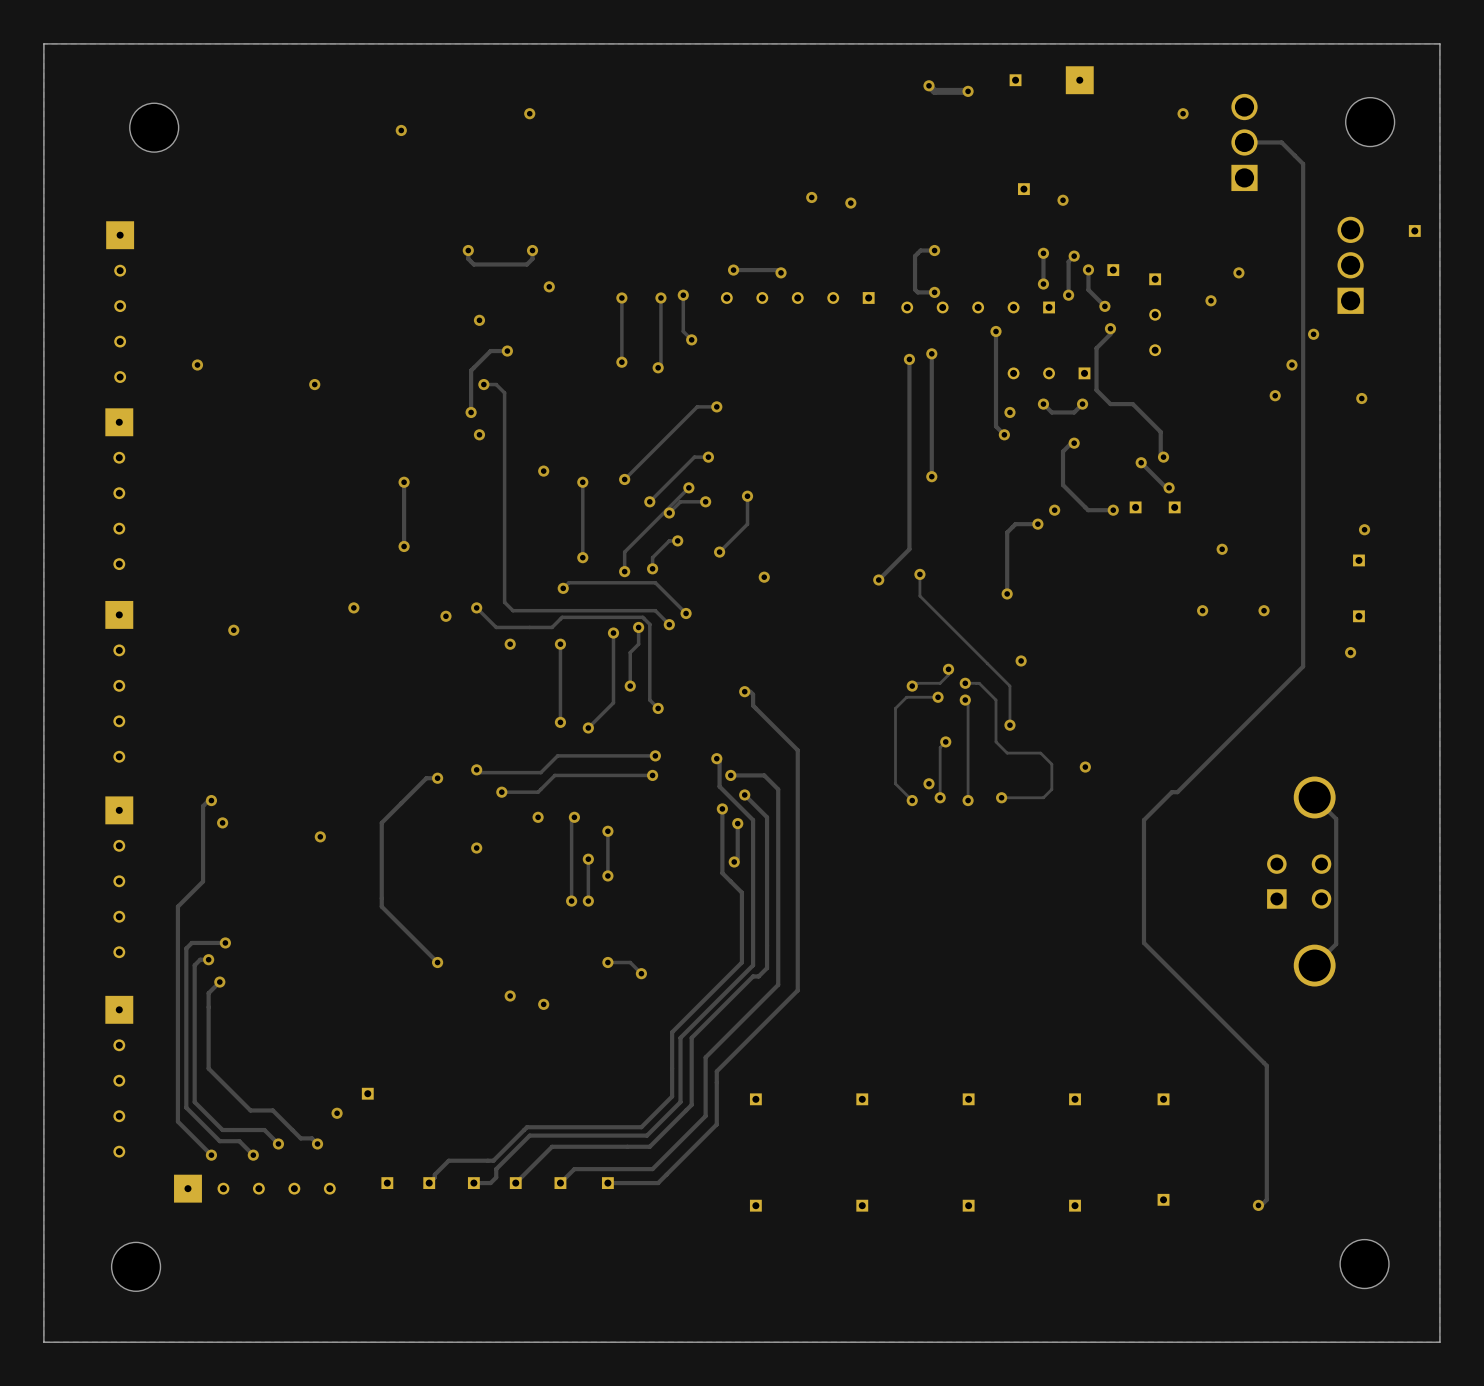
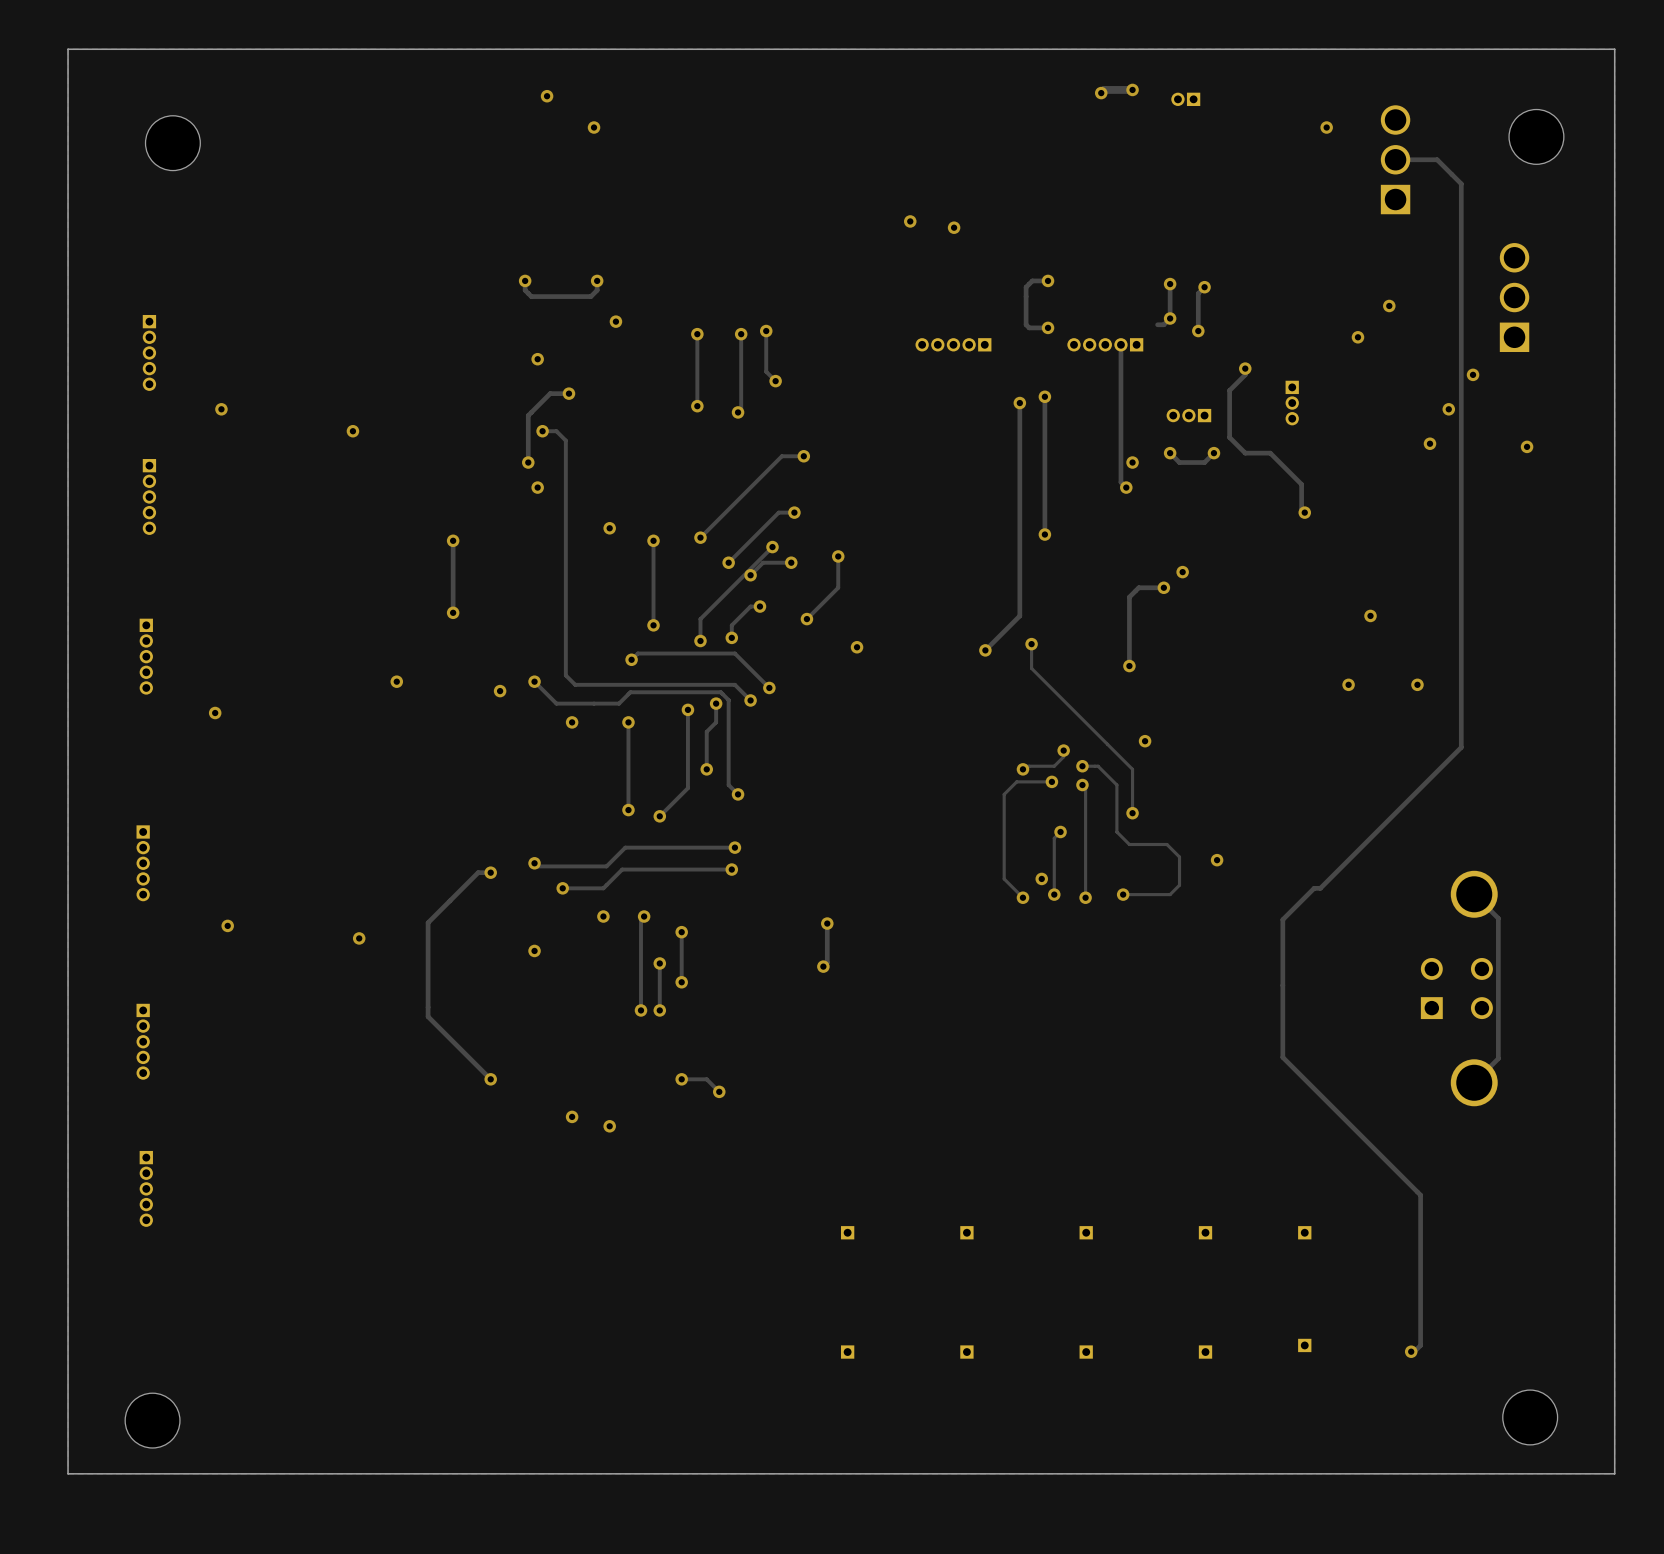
board edge: (60, 43) (43, 43) (43, 1342) (1439, 1342) (1439, 1314) -> (68, 49) (68, 1473) (1614, 1473)
track: none -> (1132, 89) (1104, 89) (1101, 93)
via: none -> (1132, 89)
part: (1015, 80) -> none
part: (1079, 80) -> none
via: none -> (547, 96)
track: (928, 85) (934, 91) (968, 91) -> none
via: (928, 85) -> none
part: none -> (1185, 99)
via position: (968, 91) -> (1101, 93)
via: (401, 130) -> none
part: (1023, 189) -> none
via: (1063, 200) -> none
part: (1414, 230) -> none
track: (1088, 269) (1088, 289) (1104, 306) -> none
via: (1088, 269) -> none
track: (733, 270) (778, 270) (781, 272) -> none
via: (733, 270) -> none
part: (1113, 270) -> none
via: (781, 272) -> none
track: none -> (1170, 318) (1163, 324) (1157, 324)
part: (797, 297) -> none
part footprint: [901, 301, 1055, 314] -> [1067, 338, 1144, 352]
part: (120, 302) -> none
via: (1104, 306) -> none
part: none -> (953, 344)
part: none -> (149, 352)
part: (1155, 314) -> none
track: (996, 331) (996, 426) (999, 430) -> (1120, 344) (1120, 482)
via: (996, 331) -> none
part: none -> (1292, 403)
part footprint: [1007, 367, 1091, 380] -> [1166, 408, 1212, 423]
part: none -> (149, 496)
track: (1074, 443) (1071, 443) (1063, 451) (1063, 485) (1088, 510) (1113, 510) -> none
via: (1074, 443) -> none
track: (1141, 462) (1166, 487) (1169, 487) -> none
via: (1141, 462) -> none
via: (1169, 487) -> none
part: (119, 489) -> none
part: (1135, 507) -> none
part: (1174, 507) -> none
via: (1113, 510) -> none
via: (1364, 529) -> none
part: (1358, 560) -> none
part: none -> (146, 656)
part: (1358, 616) -> none
via position: (233, 630) -> (215, 713)
via: (1350, 652) -> none
part: (119, 681) -> none
track: (744, 691) (750, 691) (753, 694) (753, 705) (797, 750) (797, 990) (716, 1071) (716, 1124) (658, 1183) (607, 1183) -> none
via: (744, 691) -> none
track: (716, 758) (719, 761) (719, 786) (753, 820) (753, 965) (680, 1037) (680, 1102) (647, 1135) (529, 1135) (496, 1169) (496, 1177) (490, 1183) (473, 1183) -> none
via: (716, 758) -> none
part: none -> (143, 863)
track: (730, 775) (764, 775) (778, 789) (778, 984) (705, 1057) (705, 1116) (652, 1169) (574, 1169) (560, 1183) -> none
via: (730, 775) -> none
track: (744, 794) (767, 817) (767, 968) (758, 976) (753, 976) (691, 1037) (691, 1104) (649, 1146) (552, 1146) (515, 1183) -> none
via: (744, 794) -> none
track: (211, 800) (208, 800) (203, 806) (203, 881) (177, 906) (177, 1121) (211, 1155) -> none
via: (211, 800) -> none
track: (722, 808) (722, 873) (741, 892) (741, 962) (672, 1032) (672, 1096) (641, 1127) (526, 1127) (493, 1160) (448, 1160) (429, 1183) -> none
via: (722, 808) -> none
via: (222, 822) -> none
via: none -> (227, 925)
part: (119, 877) -> none
part: none -> (143, 1041)
track: (225, 942) (191, 942) (186, 948) (186, 1107) (219, 1141) (239, 1141) (253, 1155) -> none
via: (225, 942) -> none
track: (208, 959) (200, 959) (194, 965) (194, 1102) (222, 1130) (264, 1130) (278, 1143) -> none
via: (208, 959) -> none
track: (219, 982) (208, 993) (208, 1068) (250, 1110) (272, 1110) (300, 1138) (311, 1138) (317, 1143) -> none
via: (219, 982) -> none
part: none -> (146, 1188)
part: (119, 1076) -> none
part: (367, 1093) -> none
via: (337, 1113) -> none
via: (278, 1143) -> none
via: (317, 1143) -> none
via: (211, 1155) -> none
via: (253, 1155) -> none
part: (387, 1183) -> none
part: (429, 1183) -> none
part: (473, 1183) -> none
part: (515, 1183) -> none
part: (560, 1183) -> none
part: (607, 1183) -> none
part: (254, 1188) -> none

